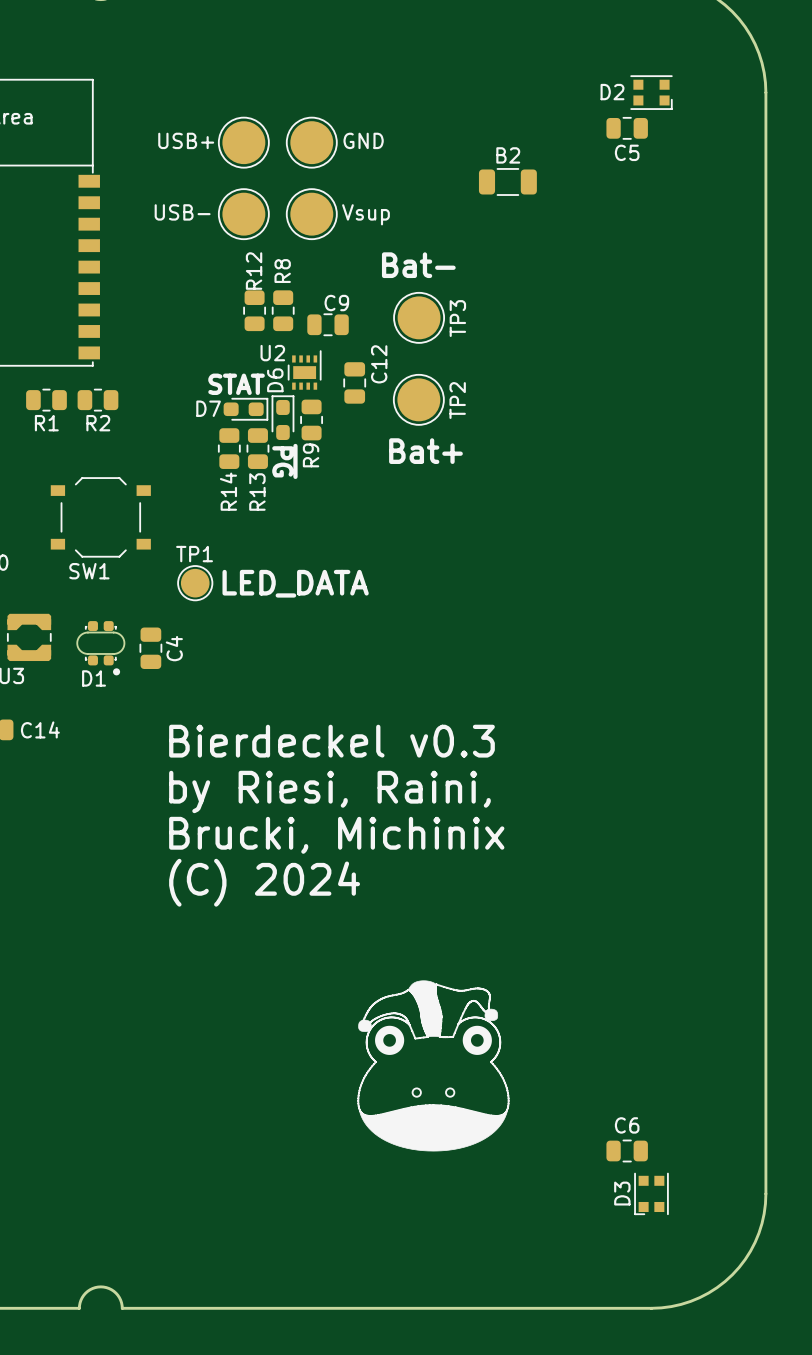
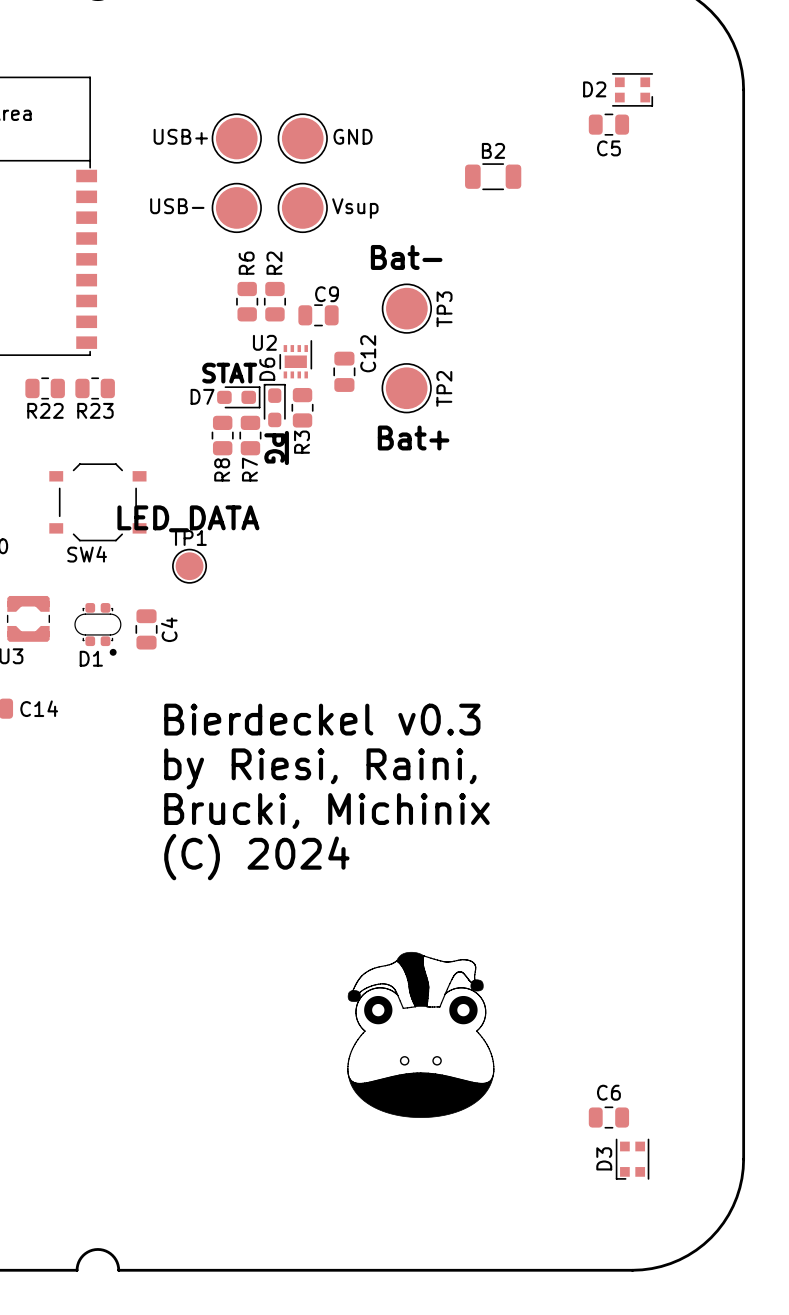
R12 name: R12 (254, 271) -> R6 (246, 263)
R8 name: R8 (282, 271) -> R2 (274, 263)
R1 name: R1 (46, 423) -> R22 (45, 410)
R2 name: R2 (98, 423) -> R23 (95, 410)
R9 name: R9 (311, 455) -> R3 (302, 442)
R14 name: R14 (228, 491) -> R8 (222, 469)
R13 name: R13 (257, 492) -> R7 (249, 469)
SW1 name: SW1 (89, 571) -> SW4 (87, 554)
text position: LED_DATA (295, 583) -> LED_DATA (188, 518)

